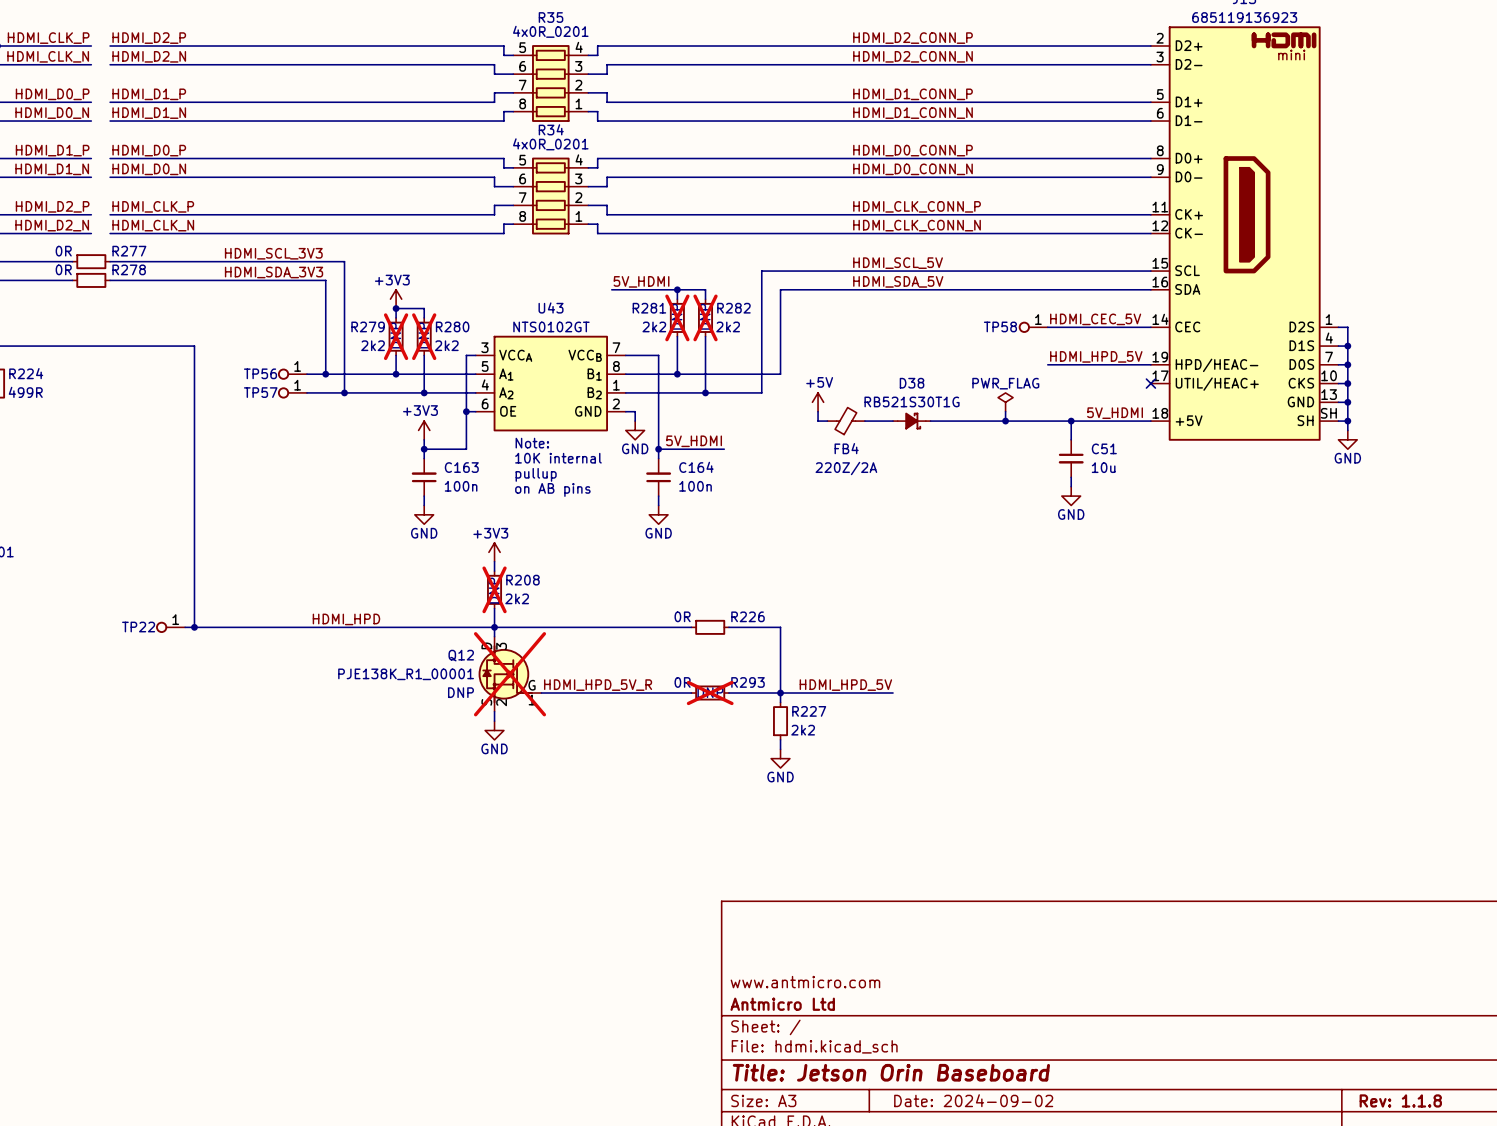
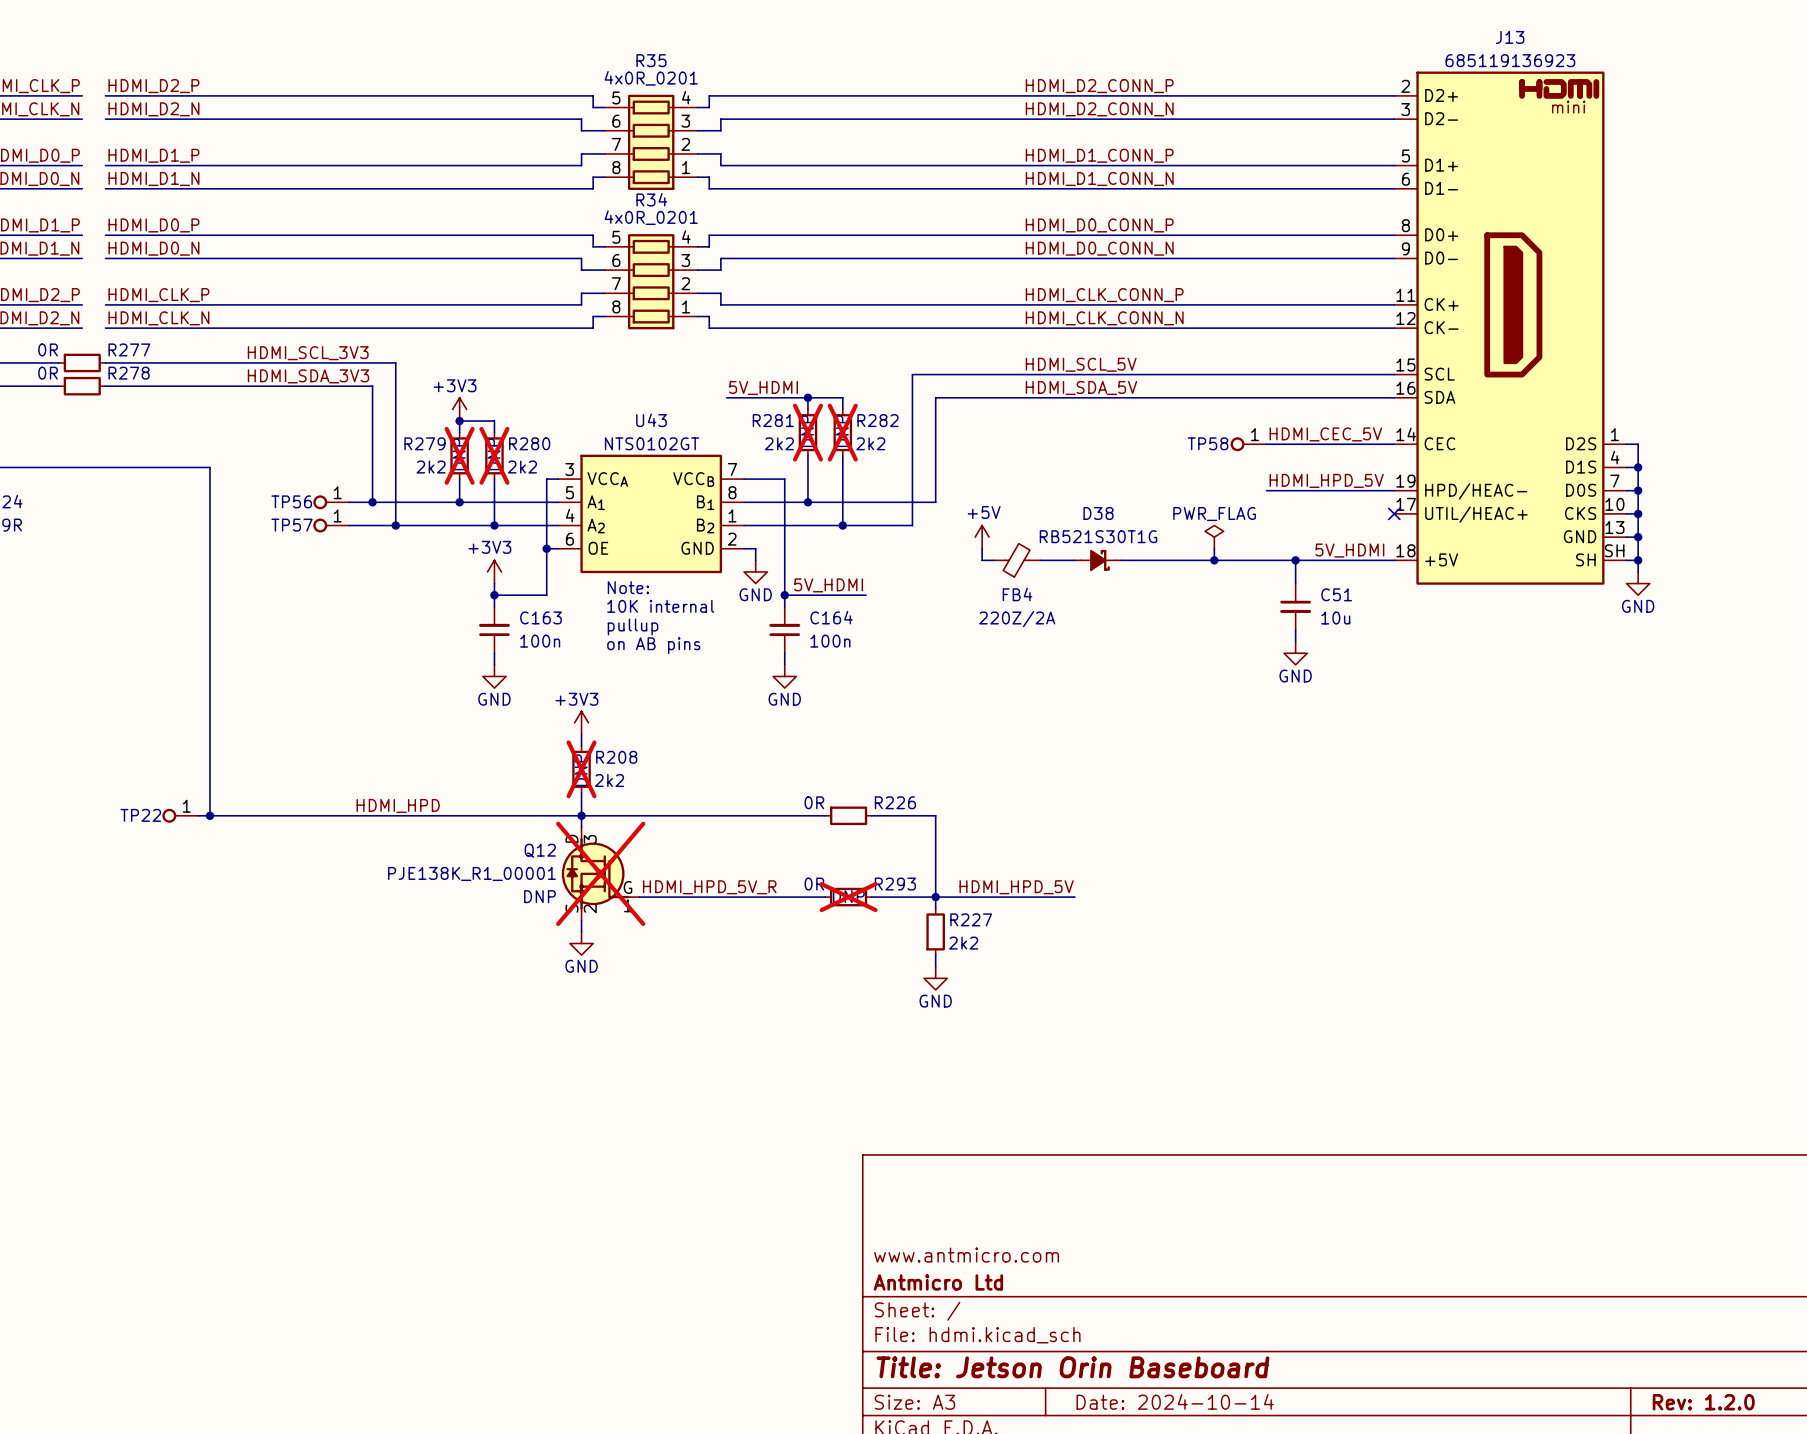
title block: Date: 2024-09-02 (973, 1100) -> Date: 2024-10-14 (1175, 1401)
title block: Rev: 1.1.8 (1400, 1100) -> Rev: 1.2.0 (1703, 1402)

